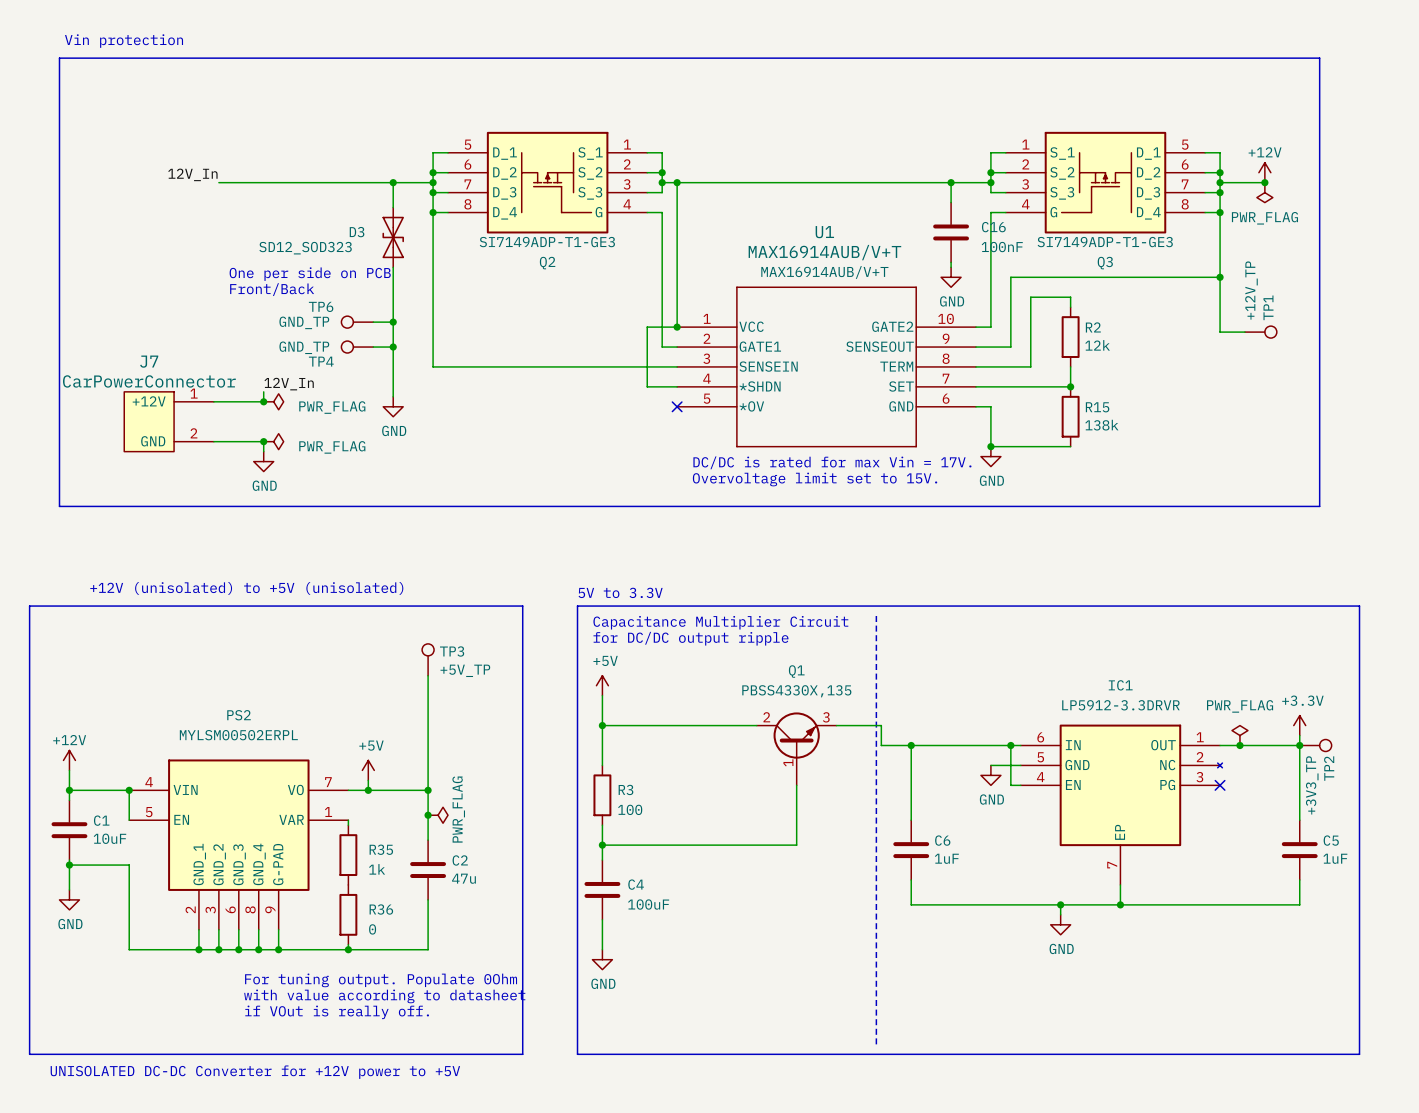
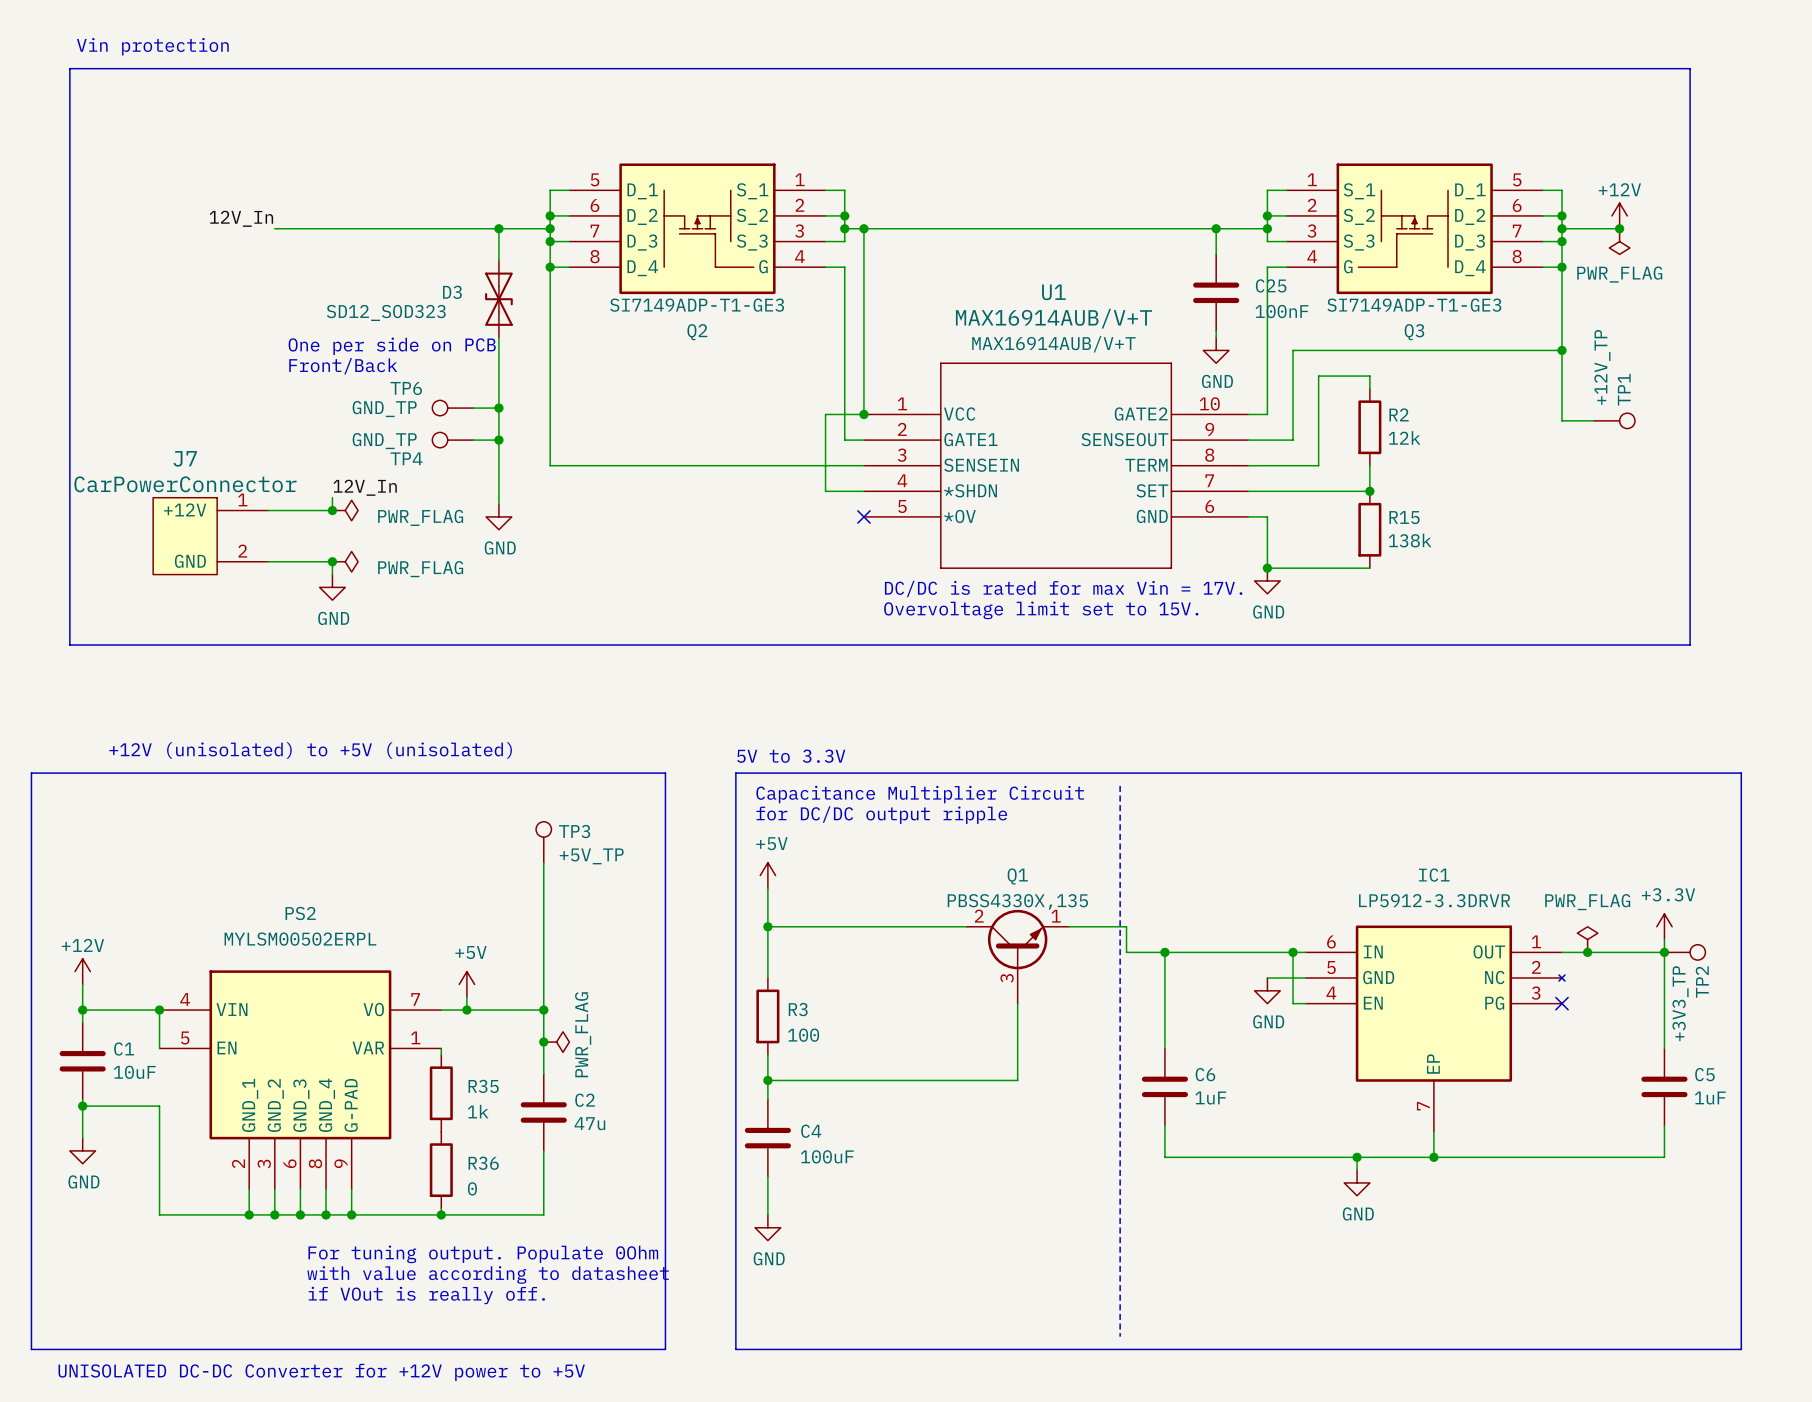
C16 name: C16 (993, 227) -> C25 (1271, 285)
Q1 symbol: [756, 712, 837, 786] -> [966, 909, 1069, 1004]

